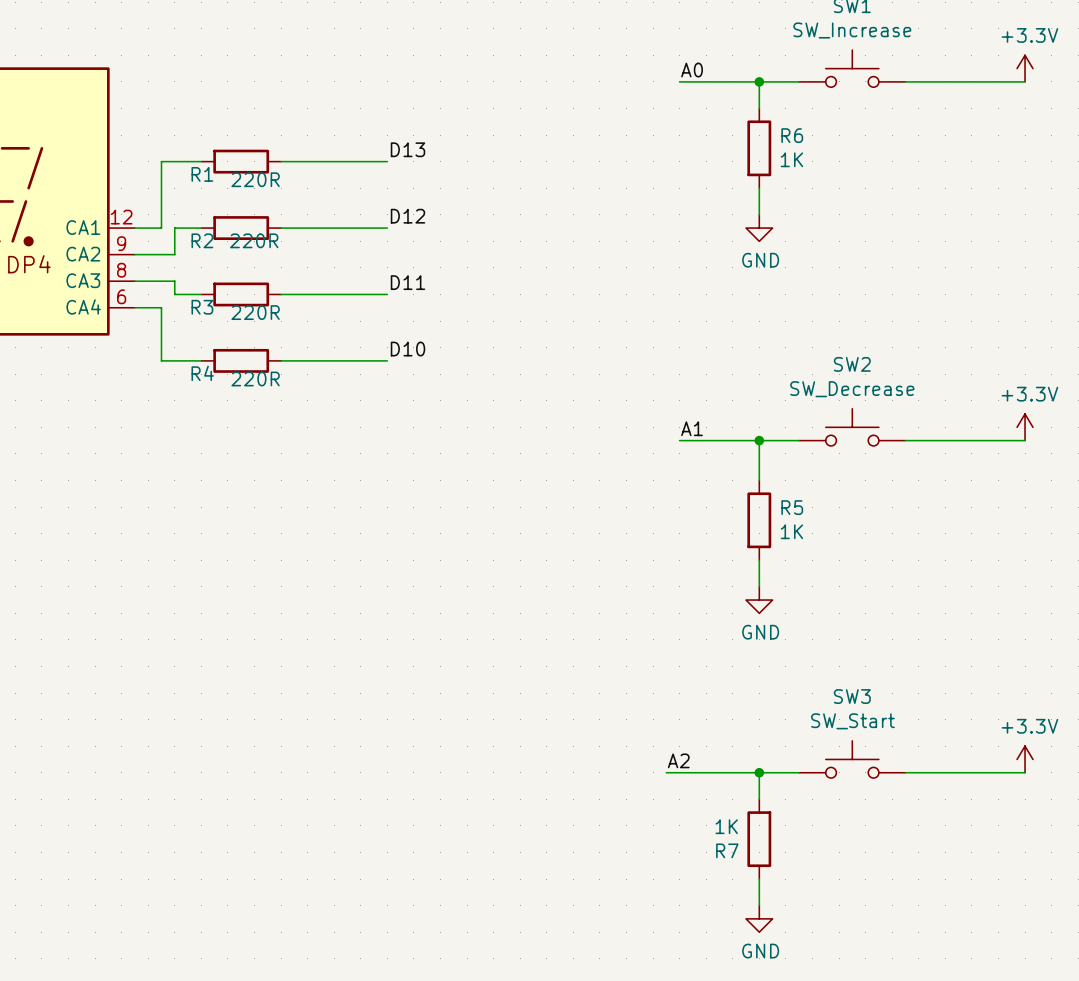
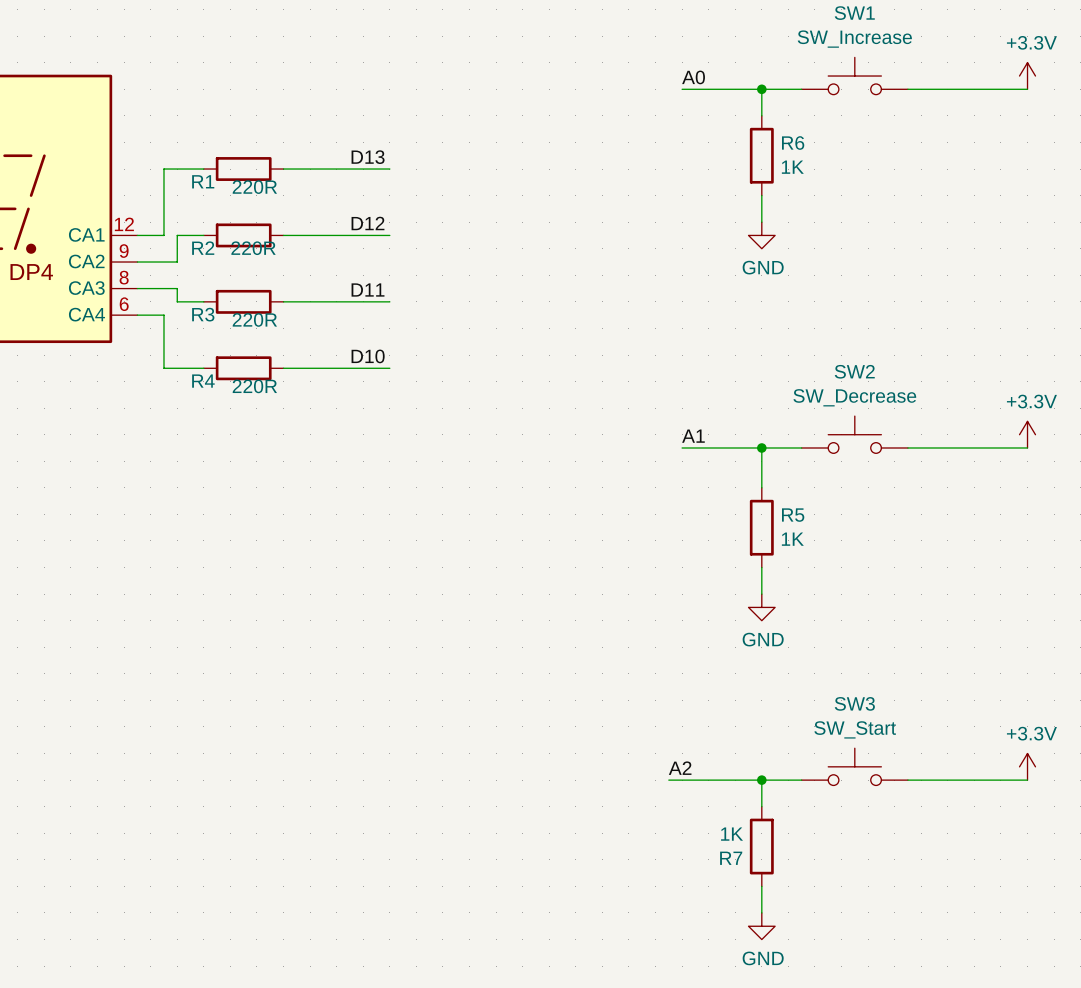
label position: D13 (407, 149) -> D13 (368, 157)
label position: D12 (407, 216) -> D12 (368, 223)
label position: D11 (407, 282) -> D11 (368, 290)
label position: D10 (407, 349) -> D10 (368, 356)

